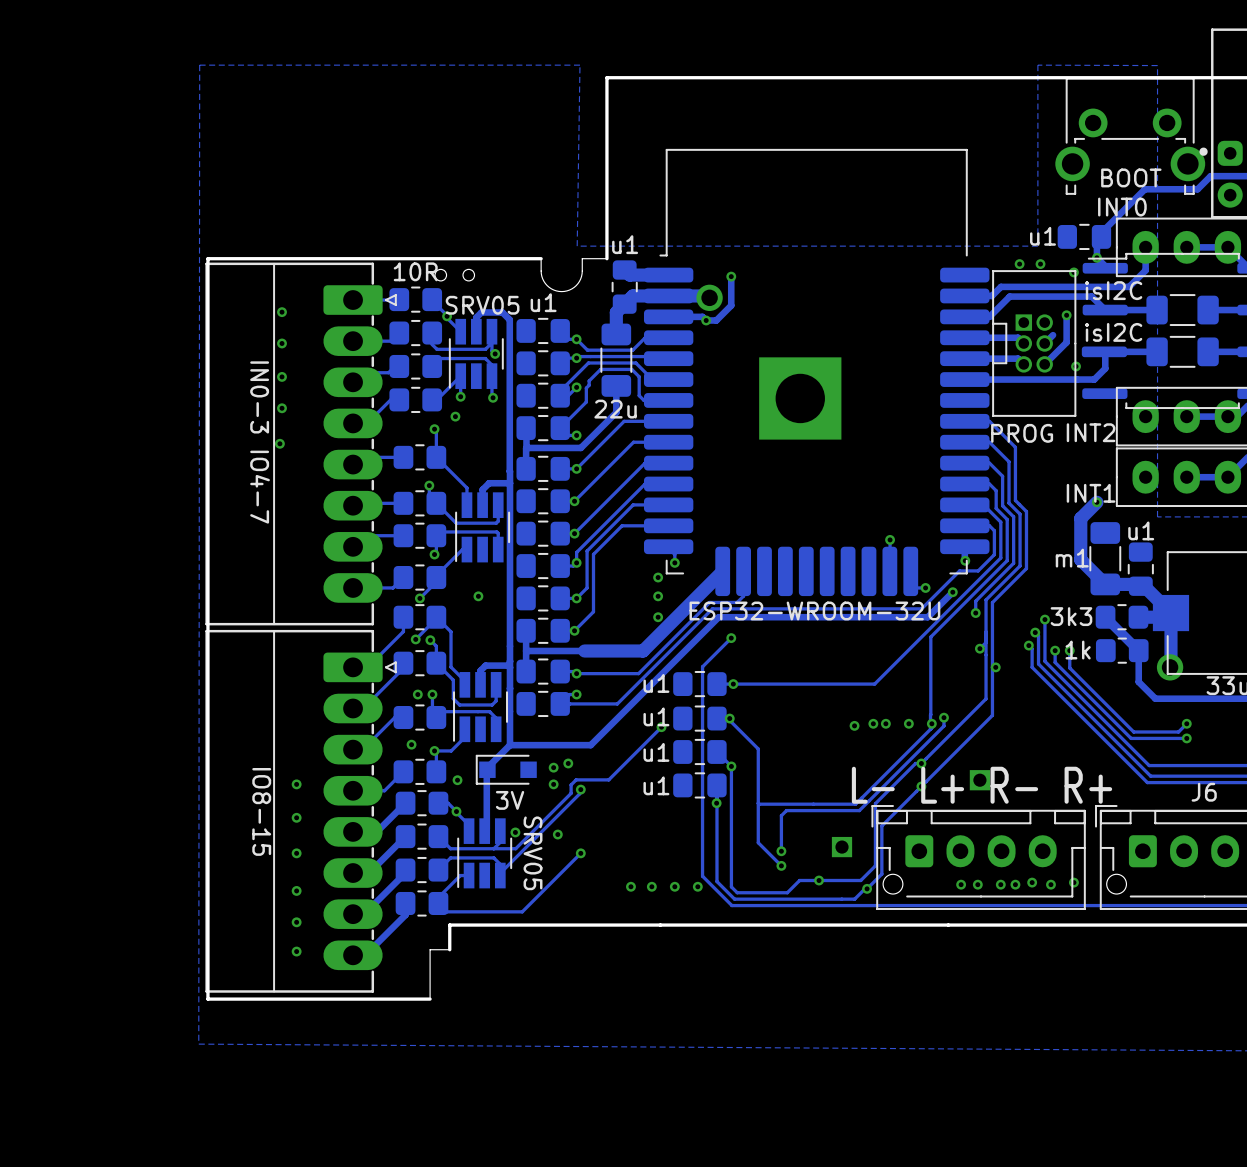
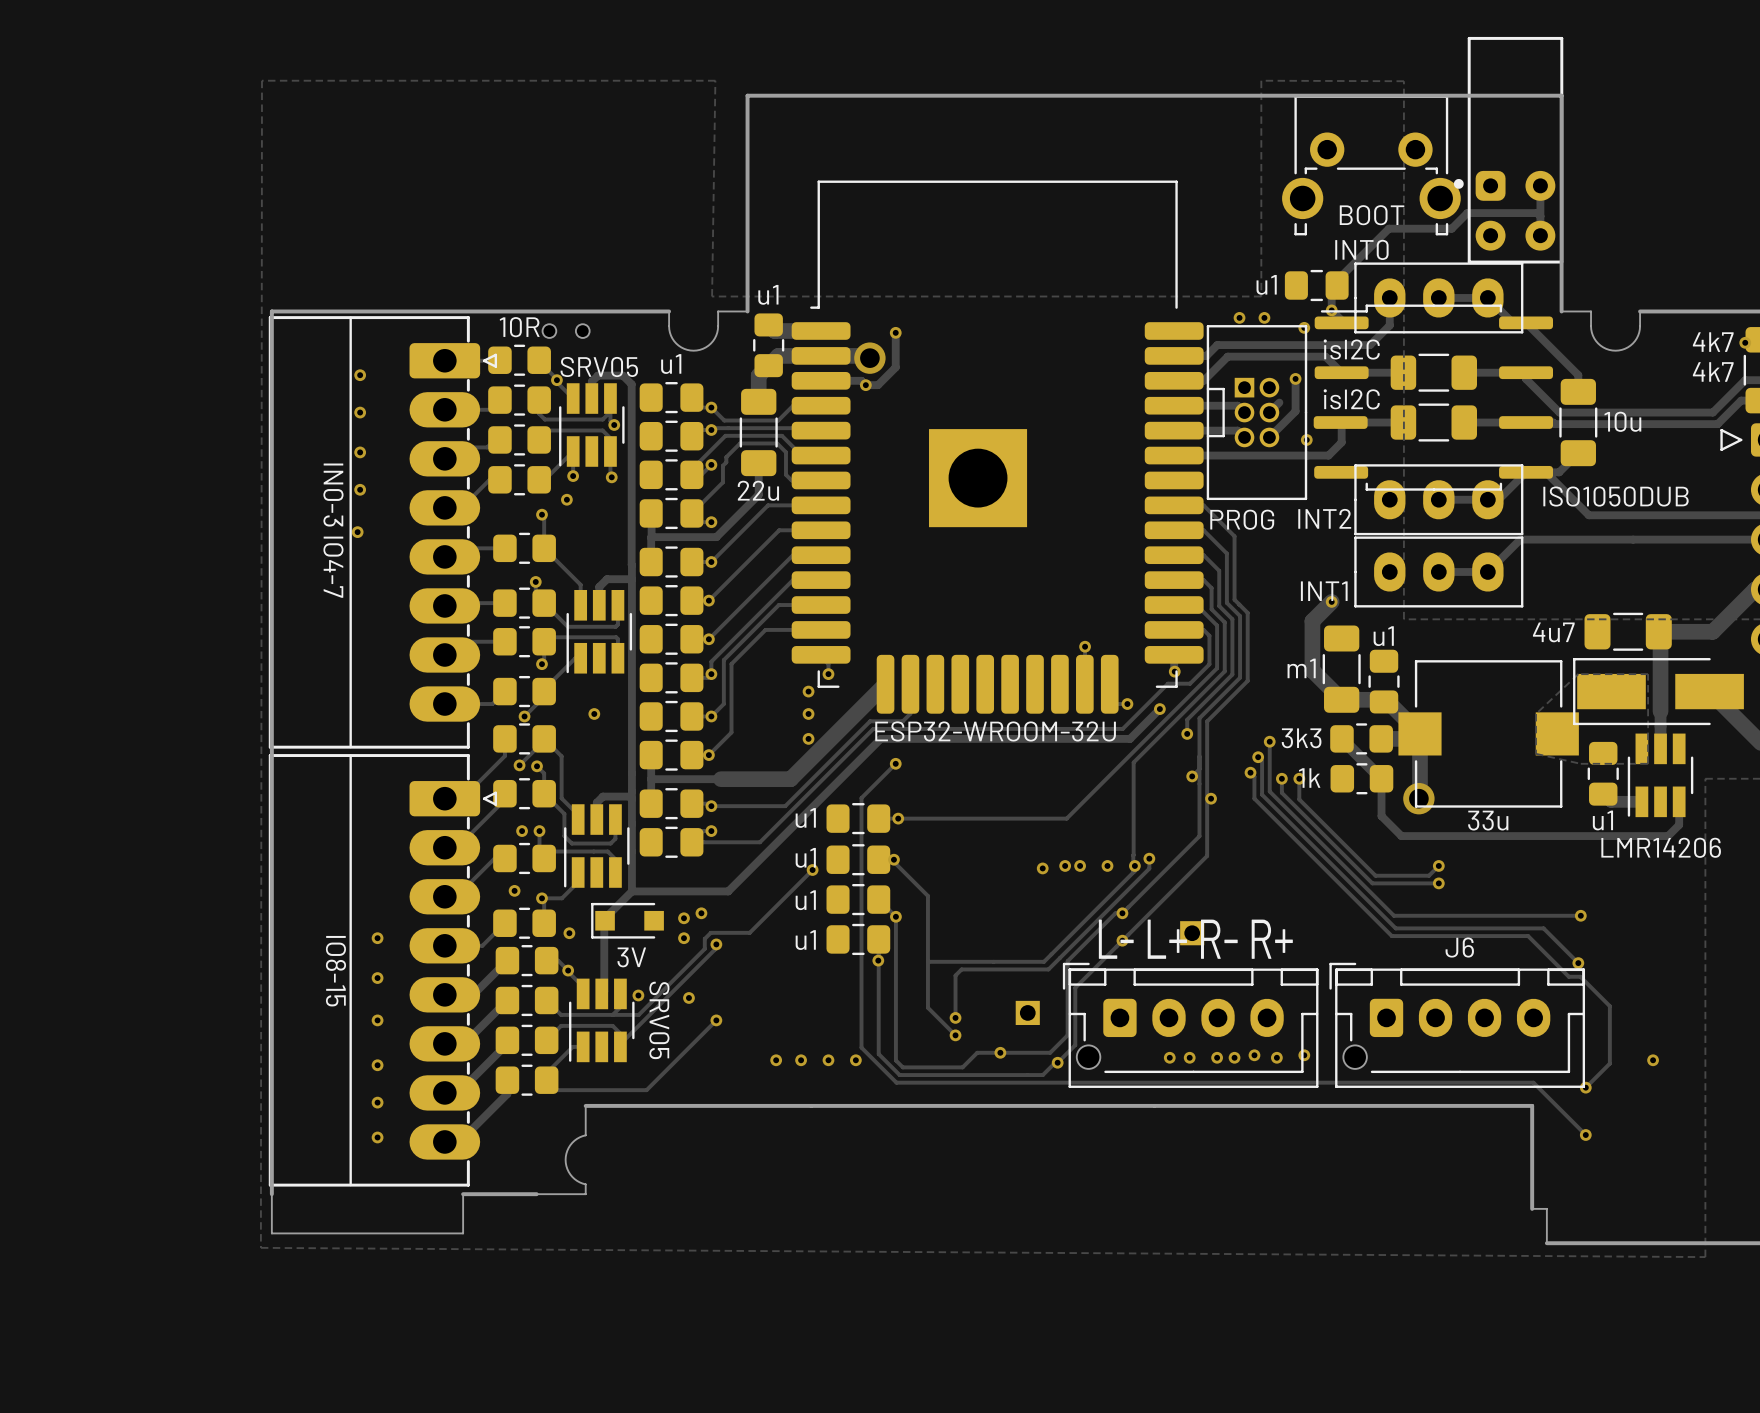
board edge: (471, 925) (449, 925) (449, 949) (430, 949) (430, 999) -> (585, 1105) (585, 1135) (577, 1138) (570, 1145) (565, 1159) (570, 1174) (577, 1180) (585, 1184) (585, 1194) (536, 1194)
board edge: (368, 999) (207, 999) -> (463, 1194) (463, 1233) (271, 1233) (271, 1194)

